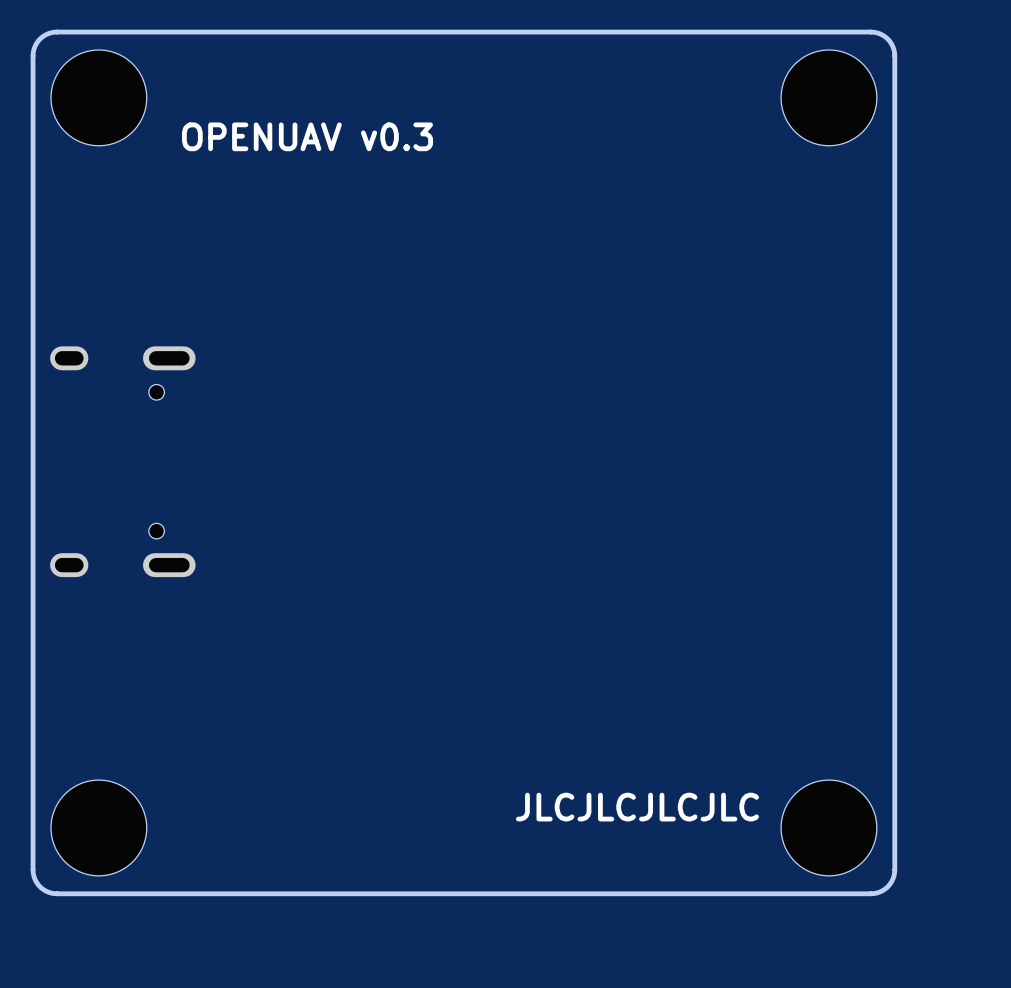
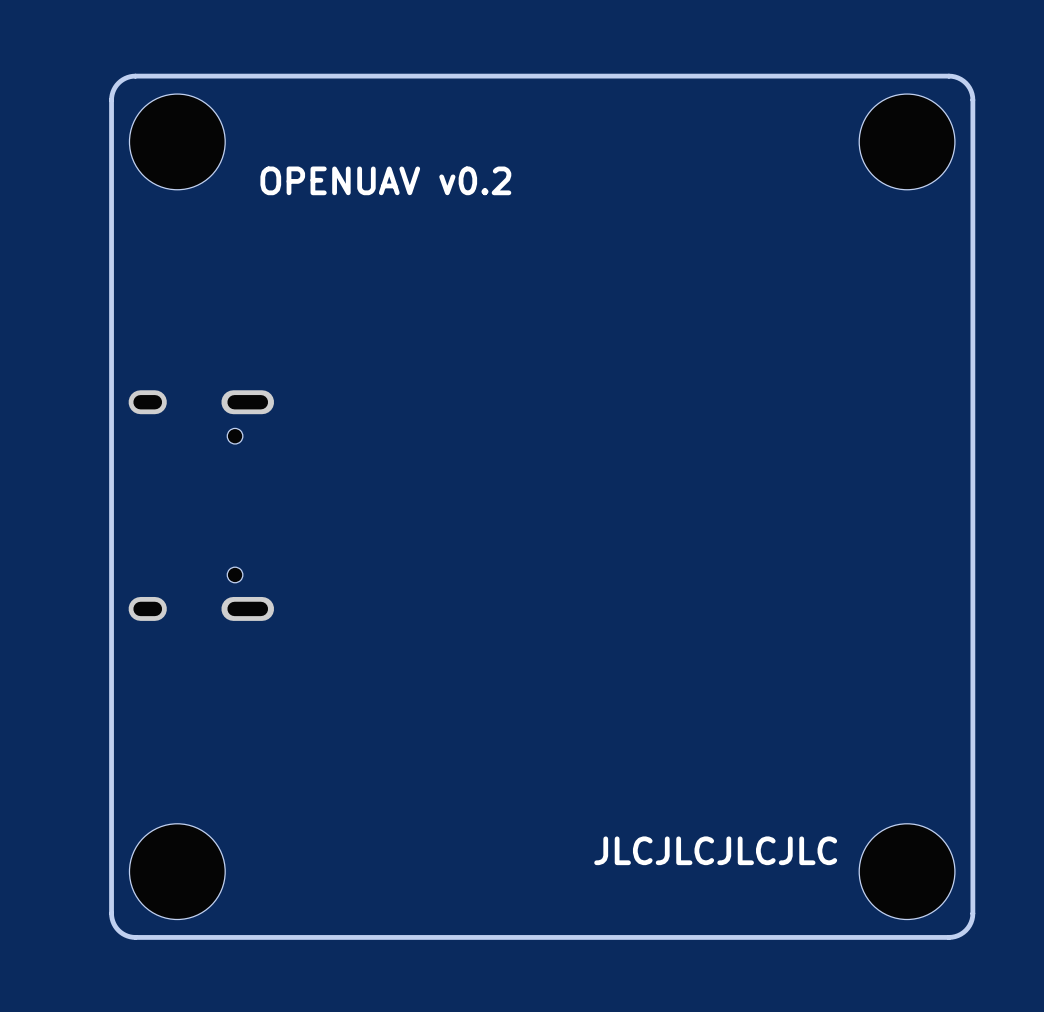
text: OPENUAV v0.3 (307, 136) -> OPENUAV v0.2 (385, 180)

